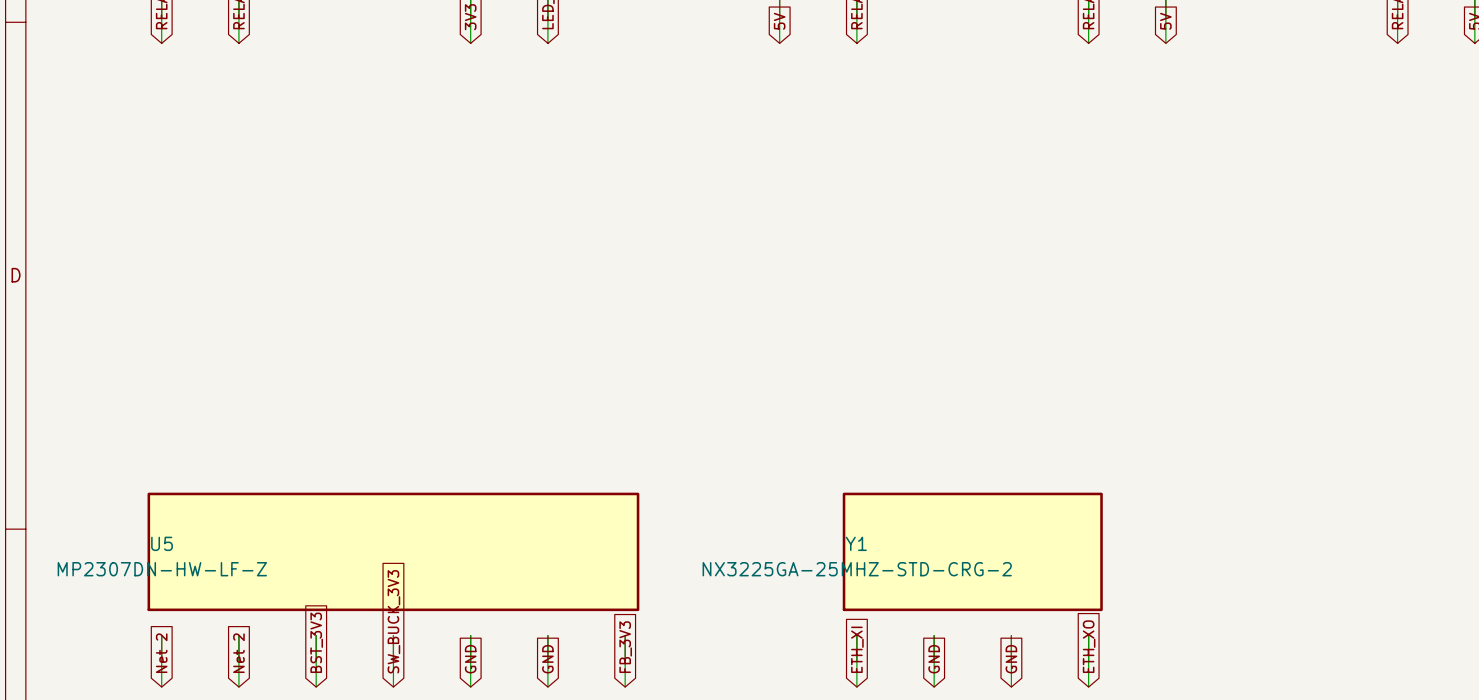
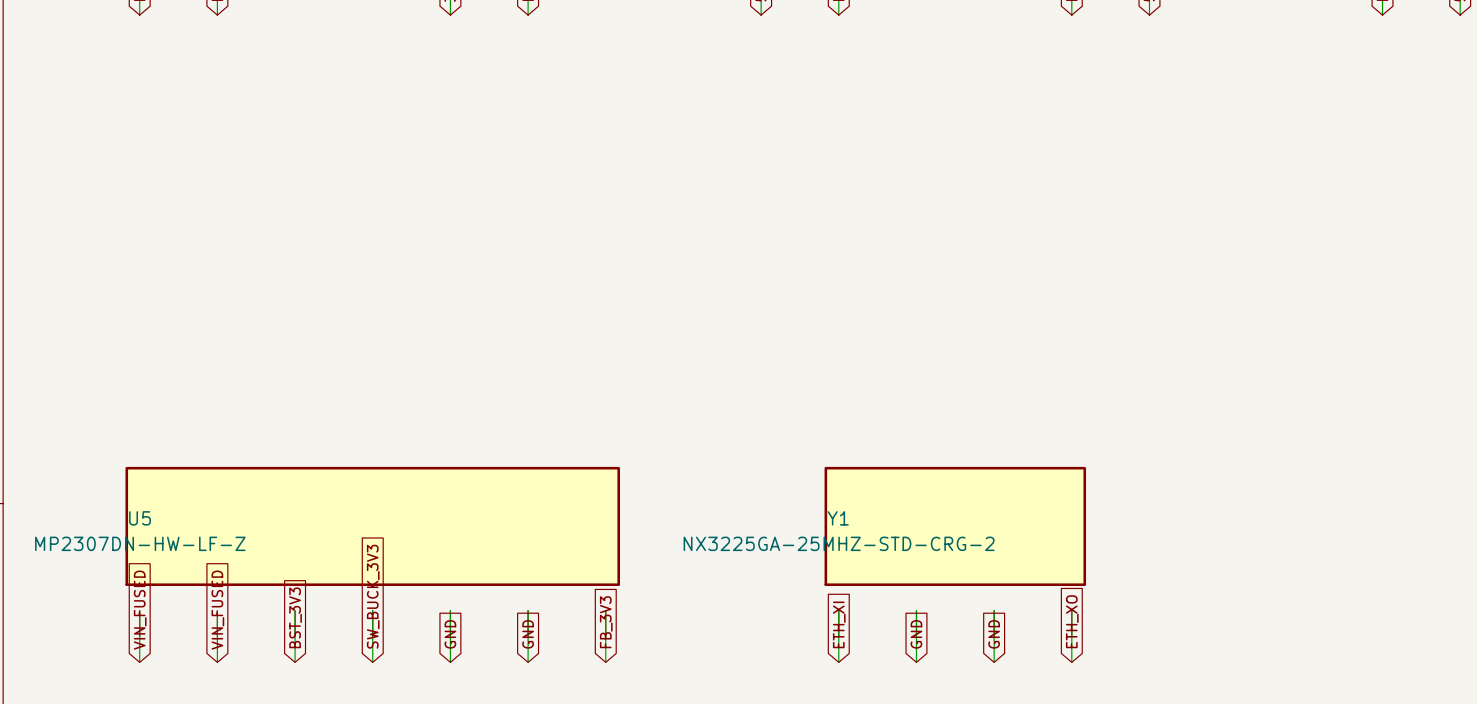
global label: Net 2 (161, 653) -> VIN_FUSED (140, 610)
global label: Net 2 (238, 653) -> VIN_FUSED (217, 610)

